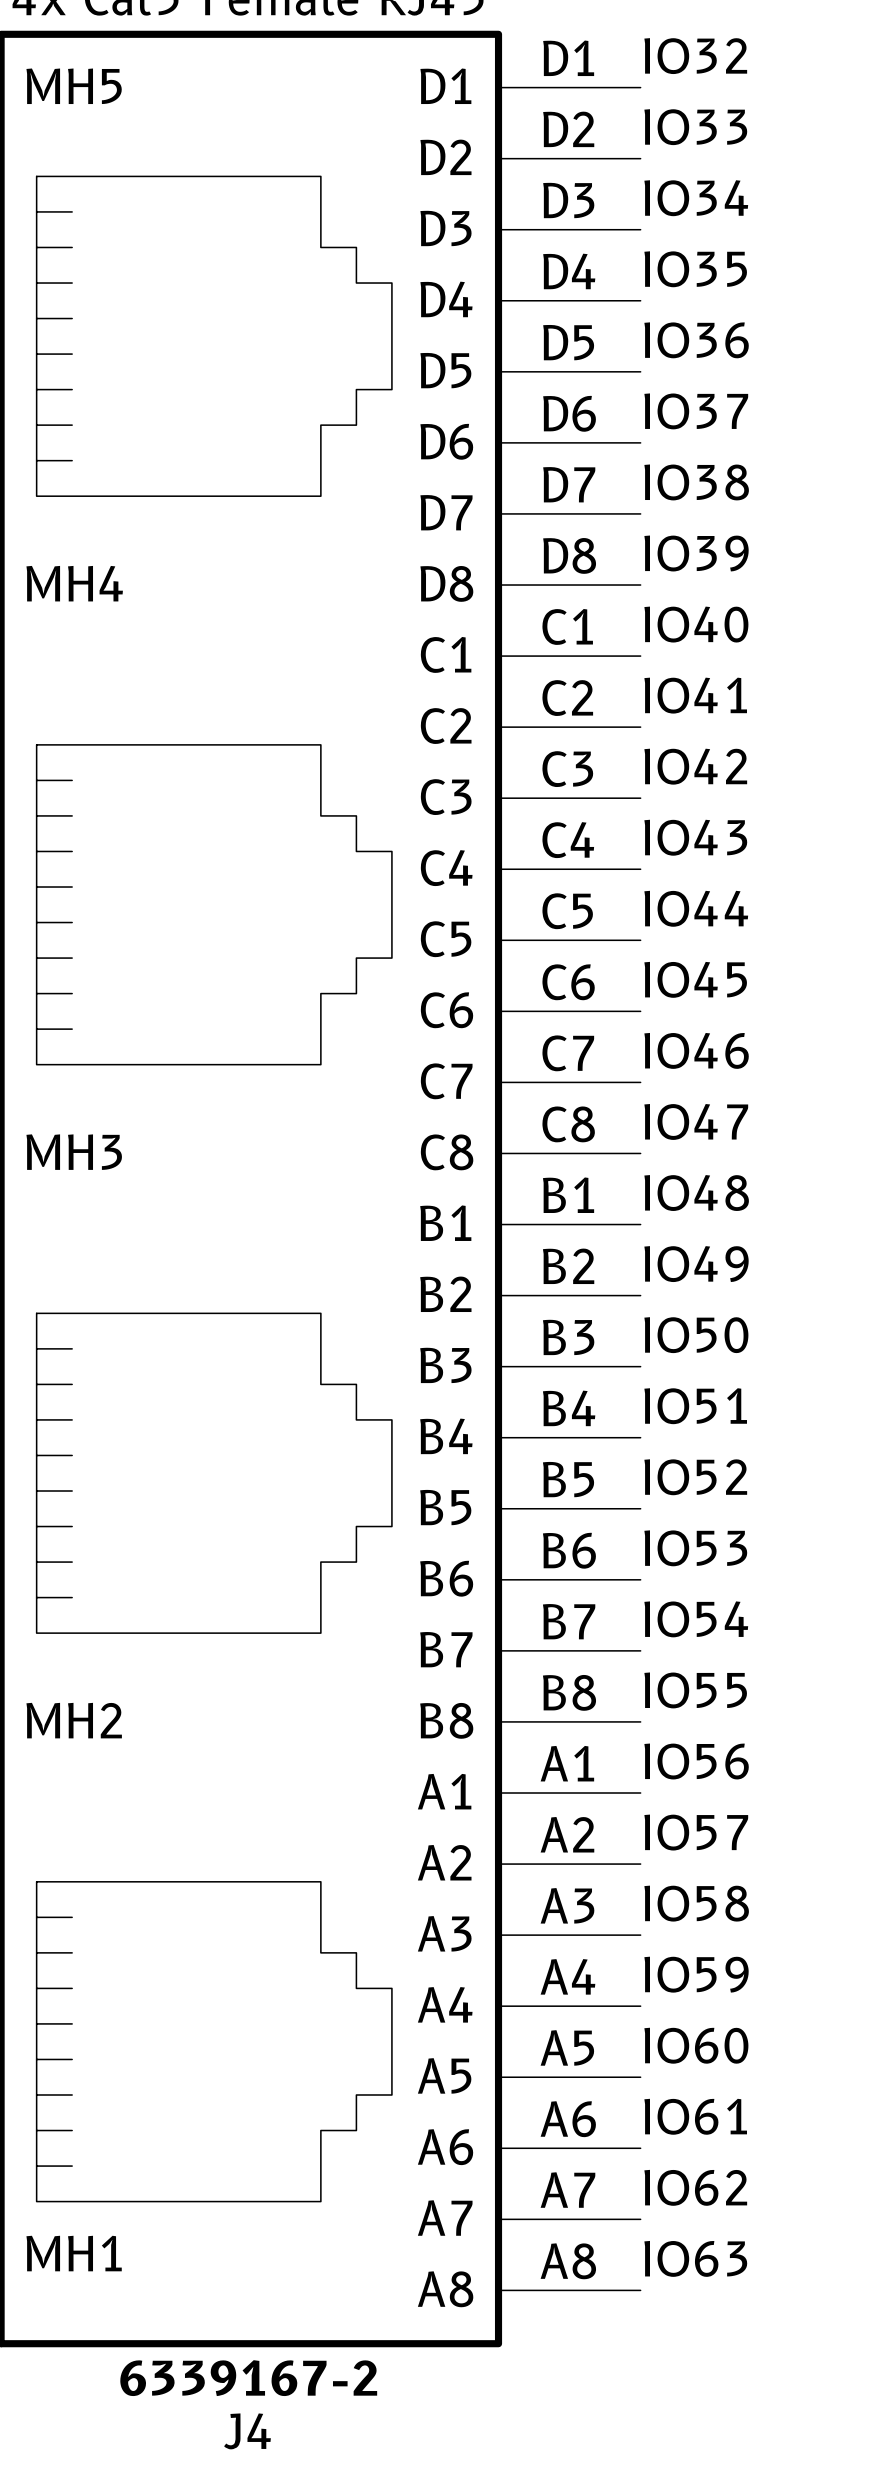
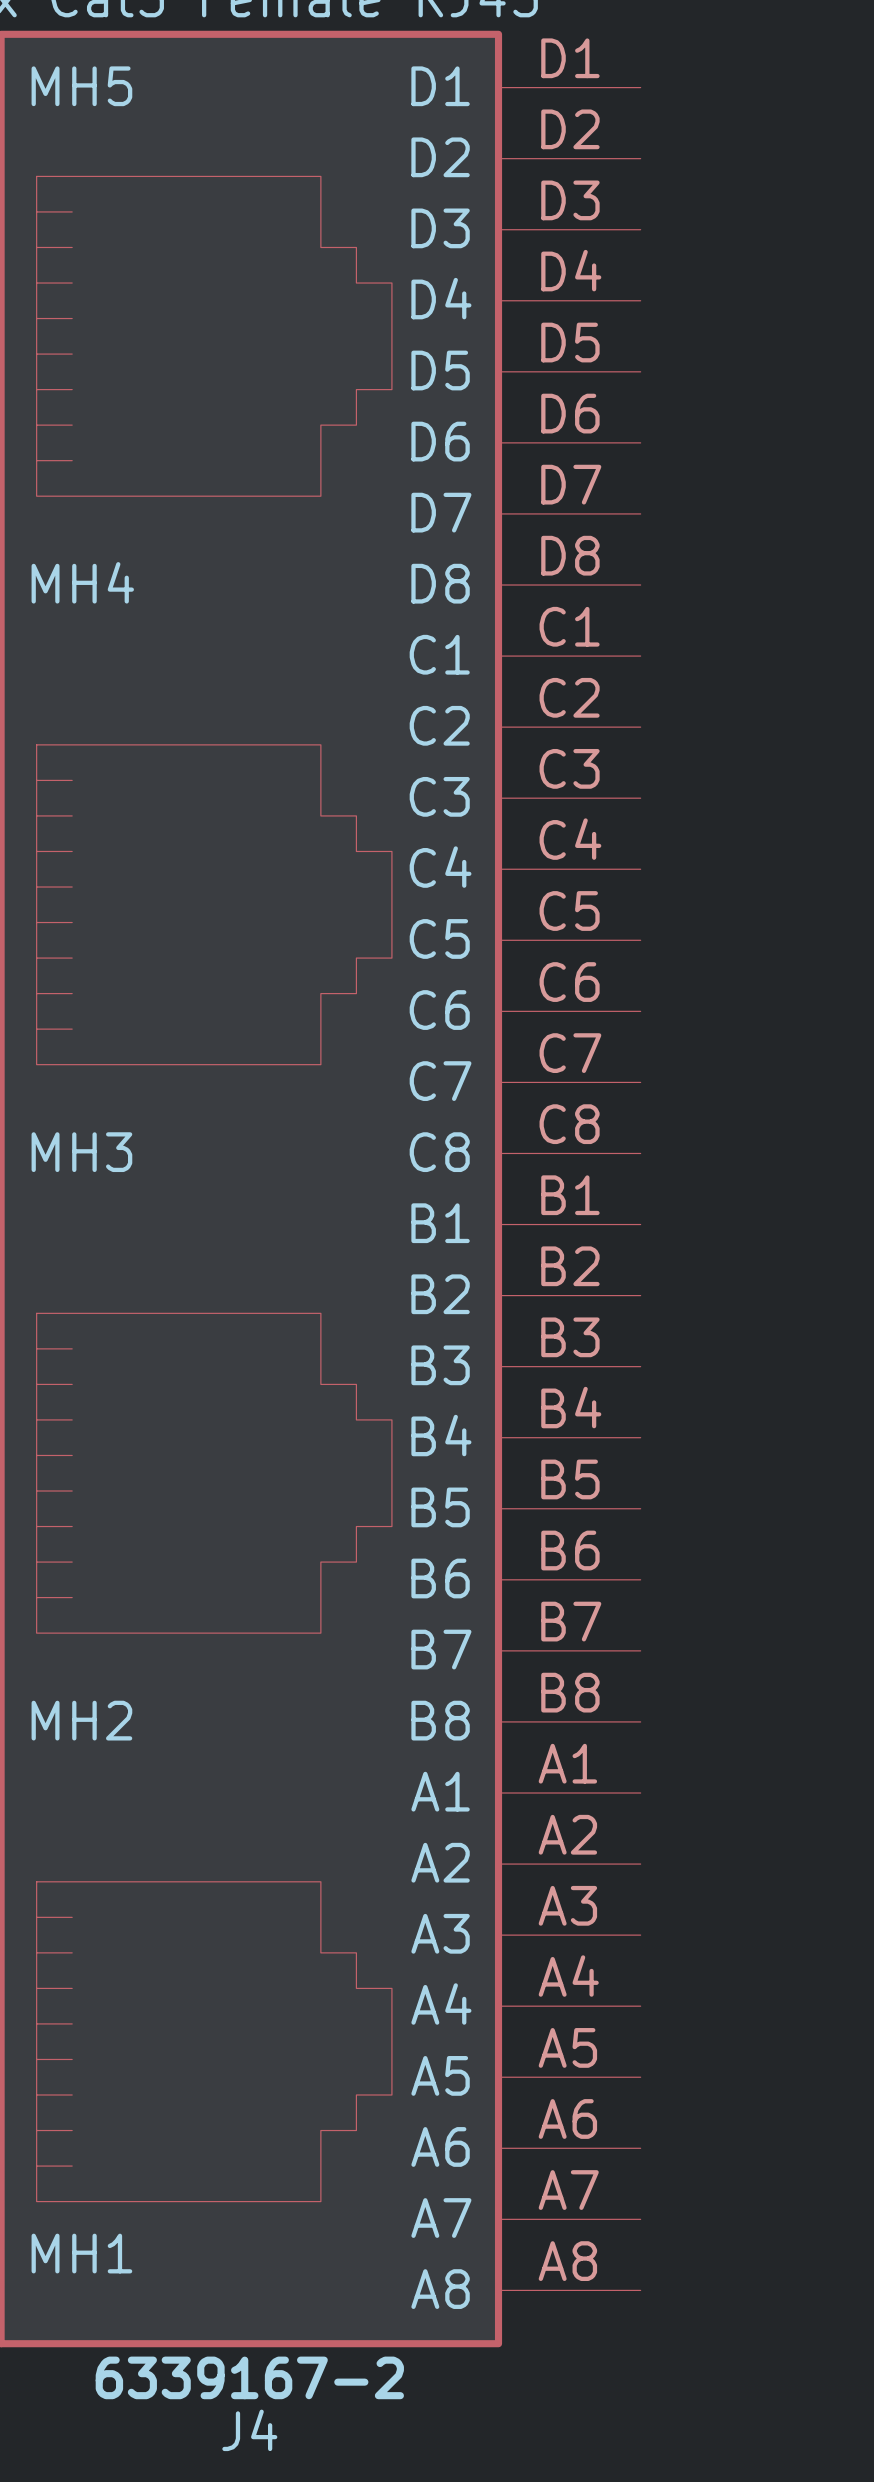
label: IO32 (695, 56) -> none
label: IO33 (695, 127) -> none
label: IO34 (696, 198) -> none
label: IO35 (695, 269) -> none
label: IO36 (696, 340) -> none
label: IO37 (696, 411) -> none
label: IO38 (696, 482) -> none
label: IO39 (696, 553) -> none
label: IO40 (696, 624) -> none
label: IO41 (695, 695) -> none
label: IO42 (695, 766) -> none
label: IO43 (695, 837) -> none
label: IO44 (696, 908) -> none
label: IO45 (695, 979) -> none
label: IO46 (696, 1050) -> none
label: IO47 (696, 1121) -> none
label: IO48 (696, 1193) -> none
label: IO49 (696, 1264) -> none
label: IO50 (696, 1335) -> none
label: IO51 (695, 1406) -> none
label: IO52 (695, 1477) -> none
label: IO53 (695, 1548) -> none
label: IO54 (696, 1619) -> none
label: IO55 (695, 1690) -> none
label: IO56 (696, 1761) -> none
label: IO57 (696, 1832) -> none
label: IO58 (696, 1903) -> none
label: IO59 (696, 1974) -> none
label: IO60 (696, 2045) -> none
label: IO61 (695, 2116) -> none
label: IO62 (695, 2187) -> none
label: IO63 (695, 2258) -> none

